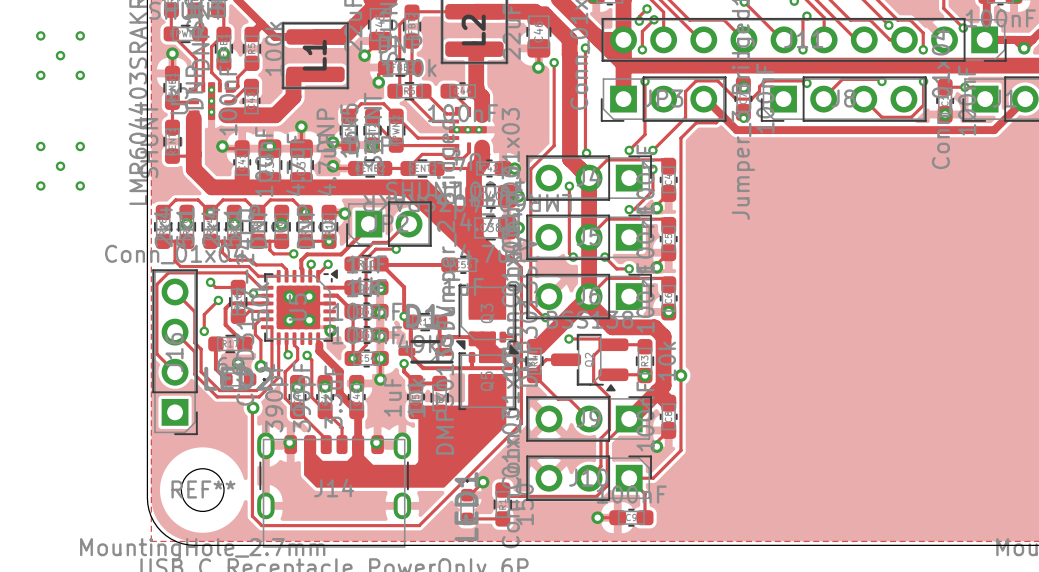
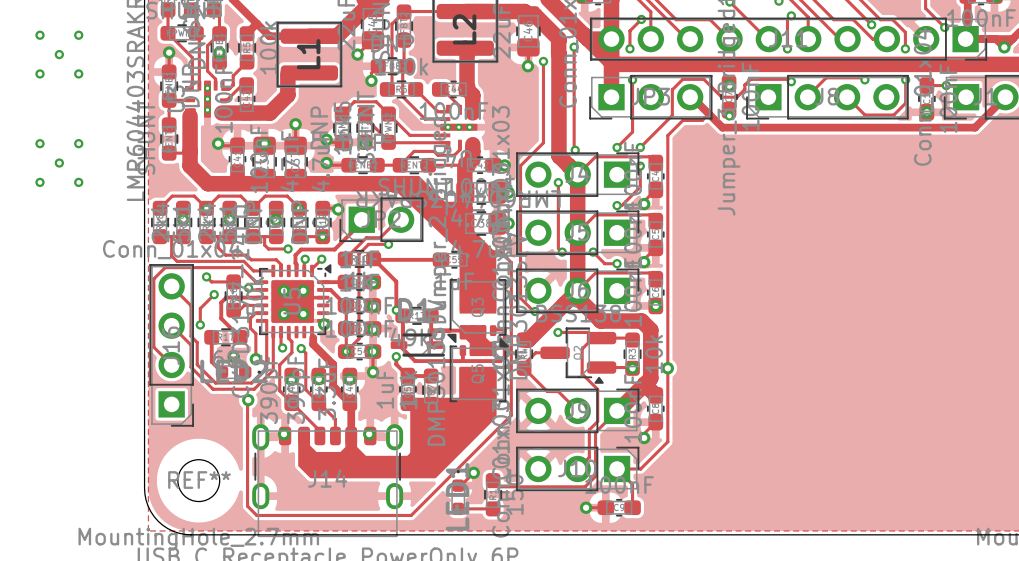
track: (647, 8) (639, 16) (639, 21) -> none
via: (647, 8) -> none
via: (639, 21) -> none

